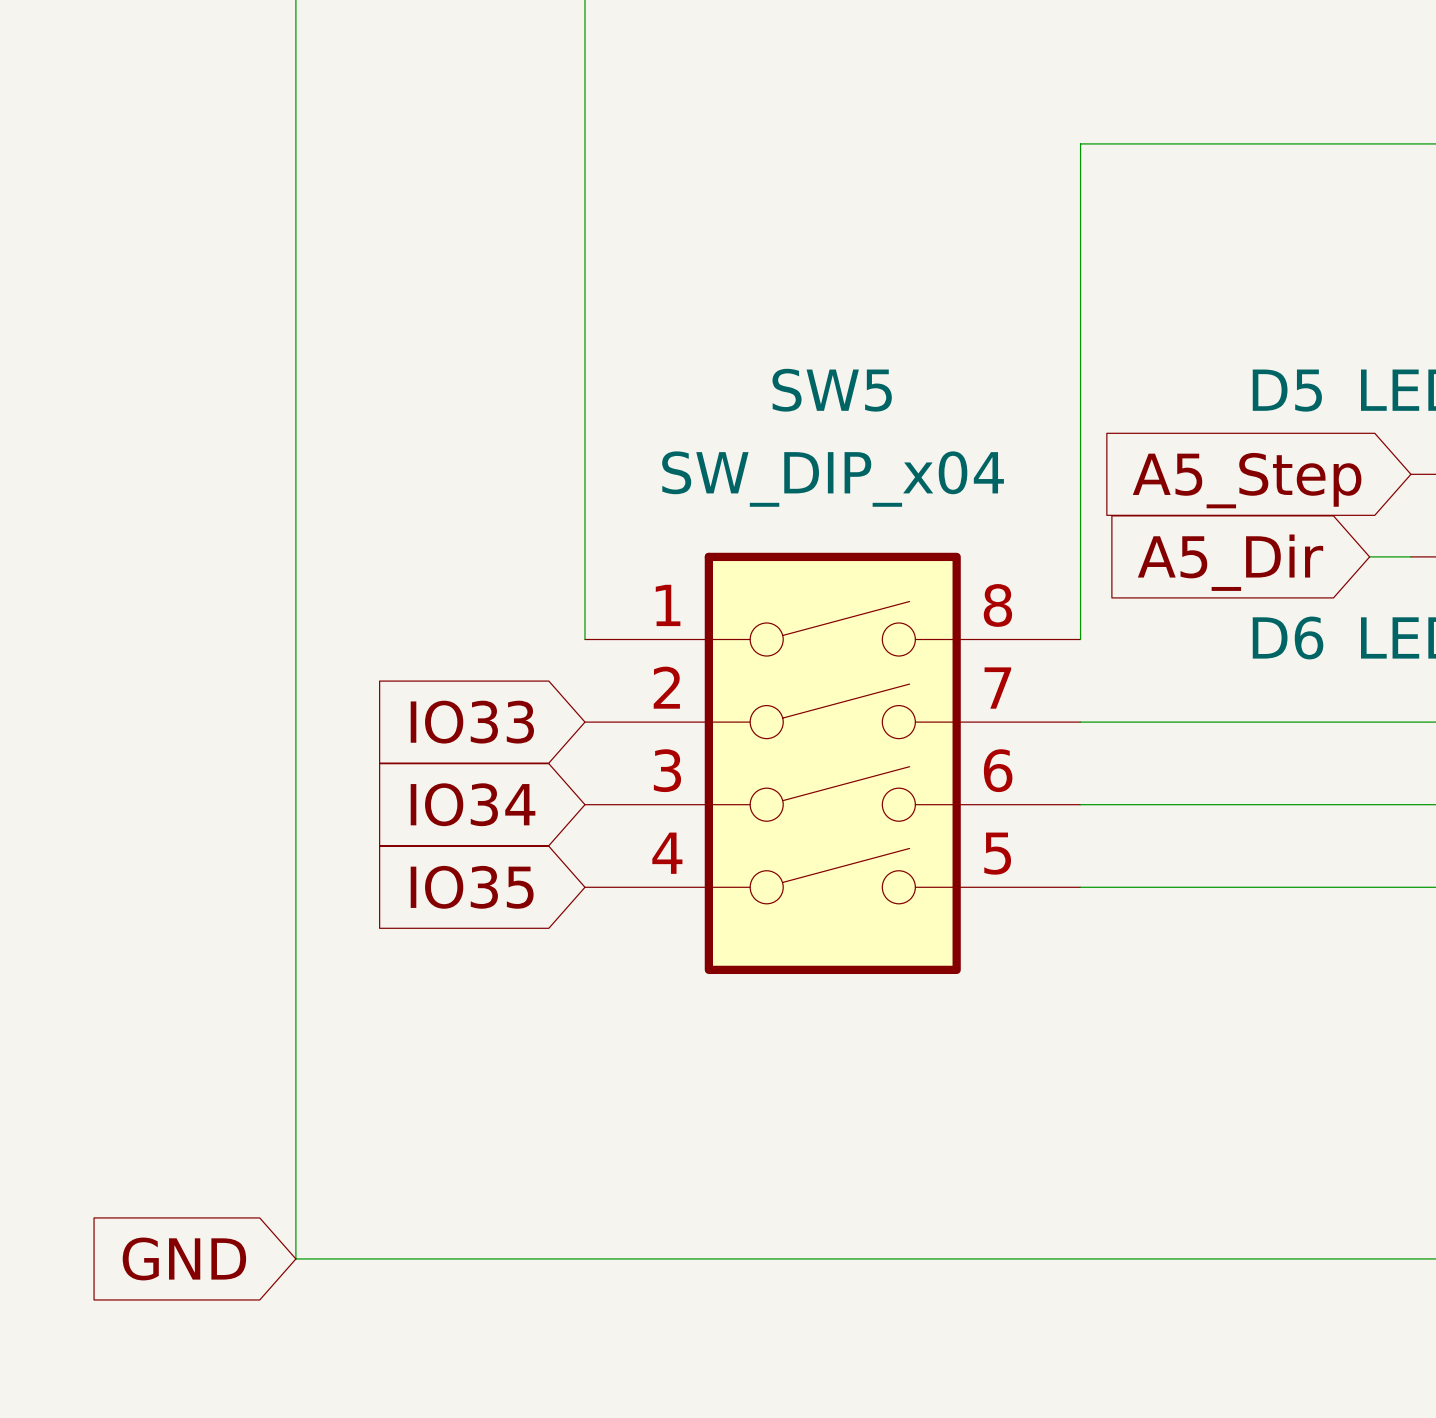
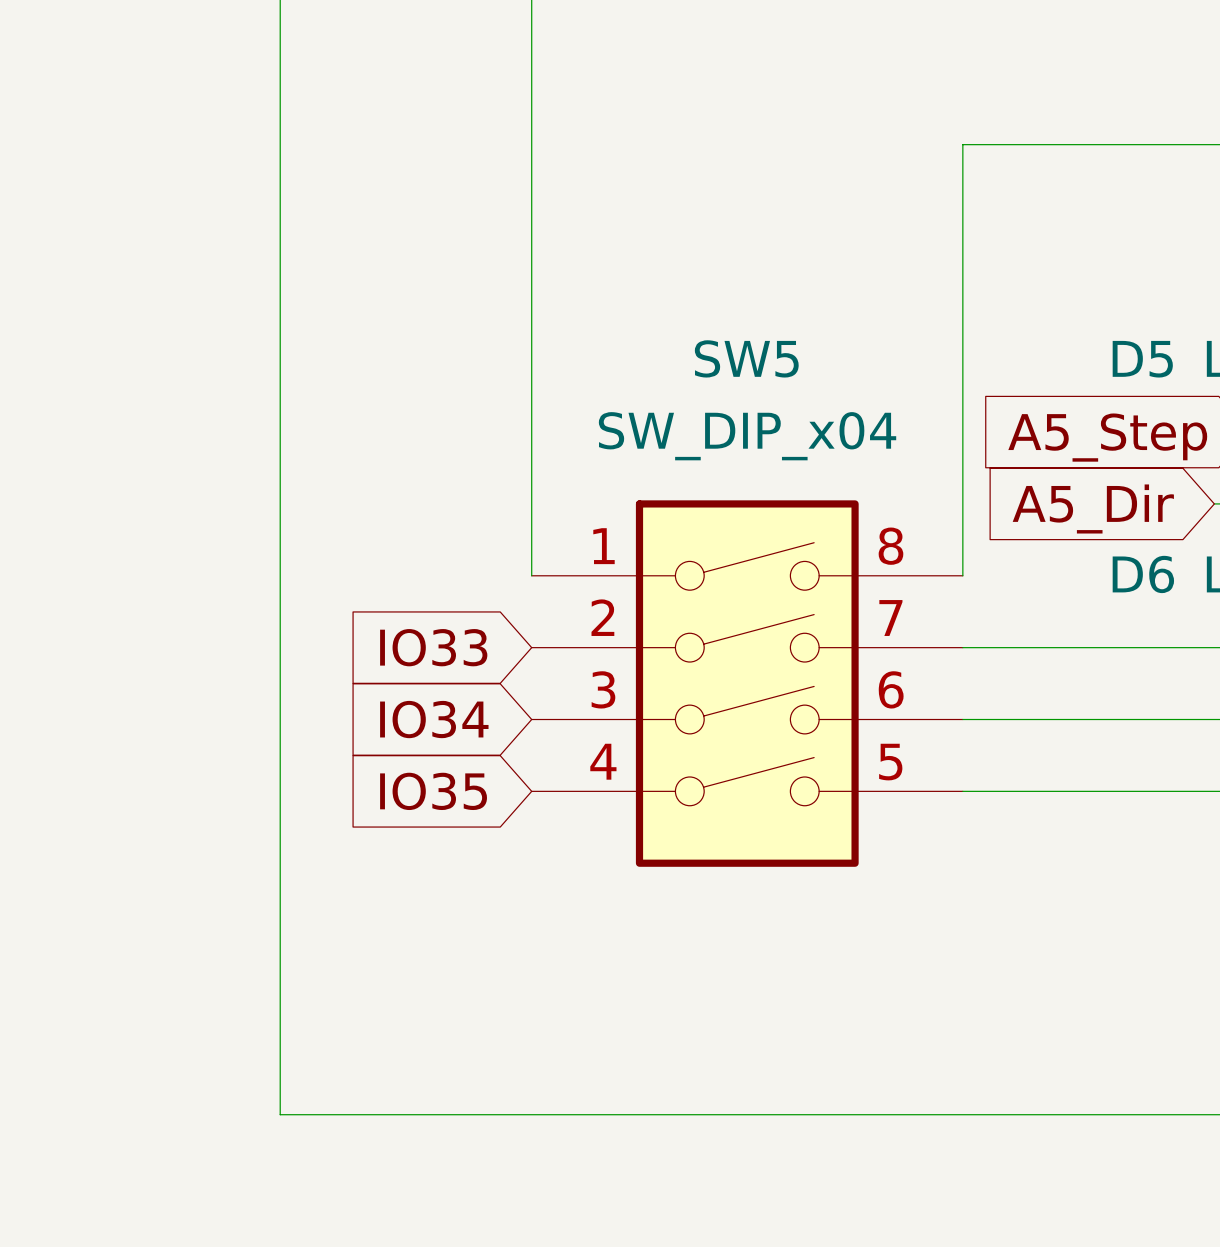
global label: GND (184, 1258) -> none

